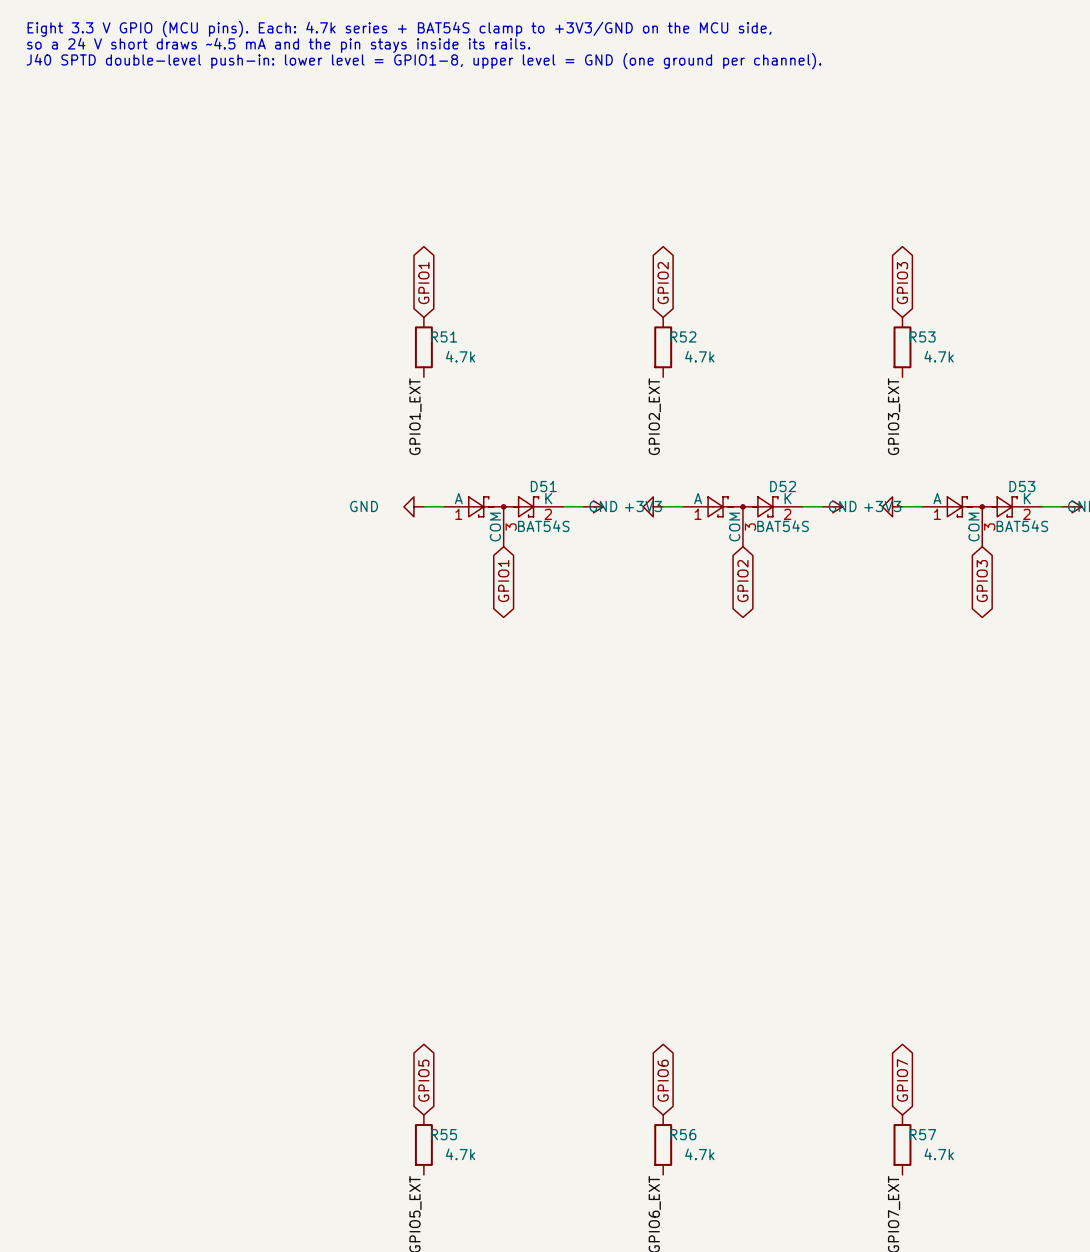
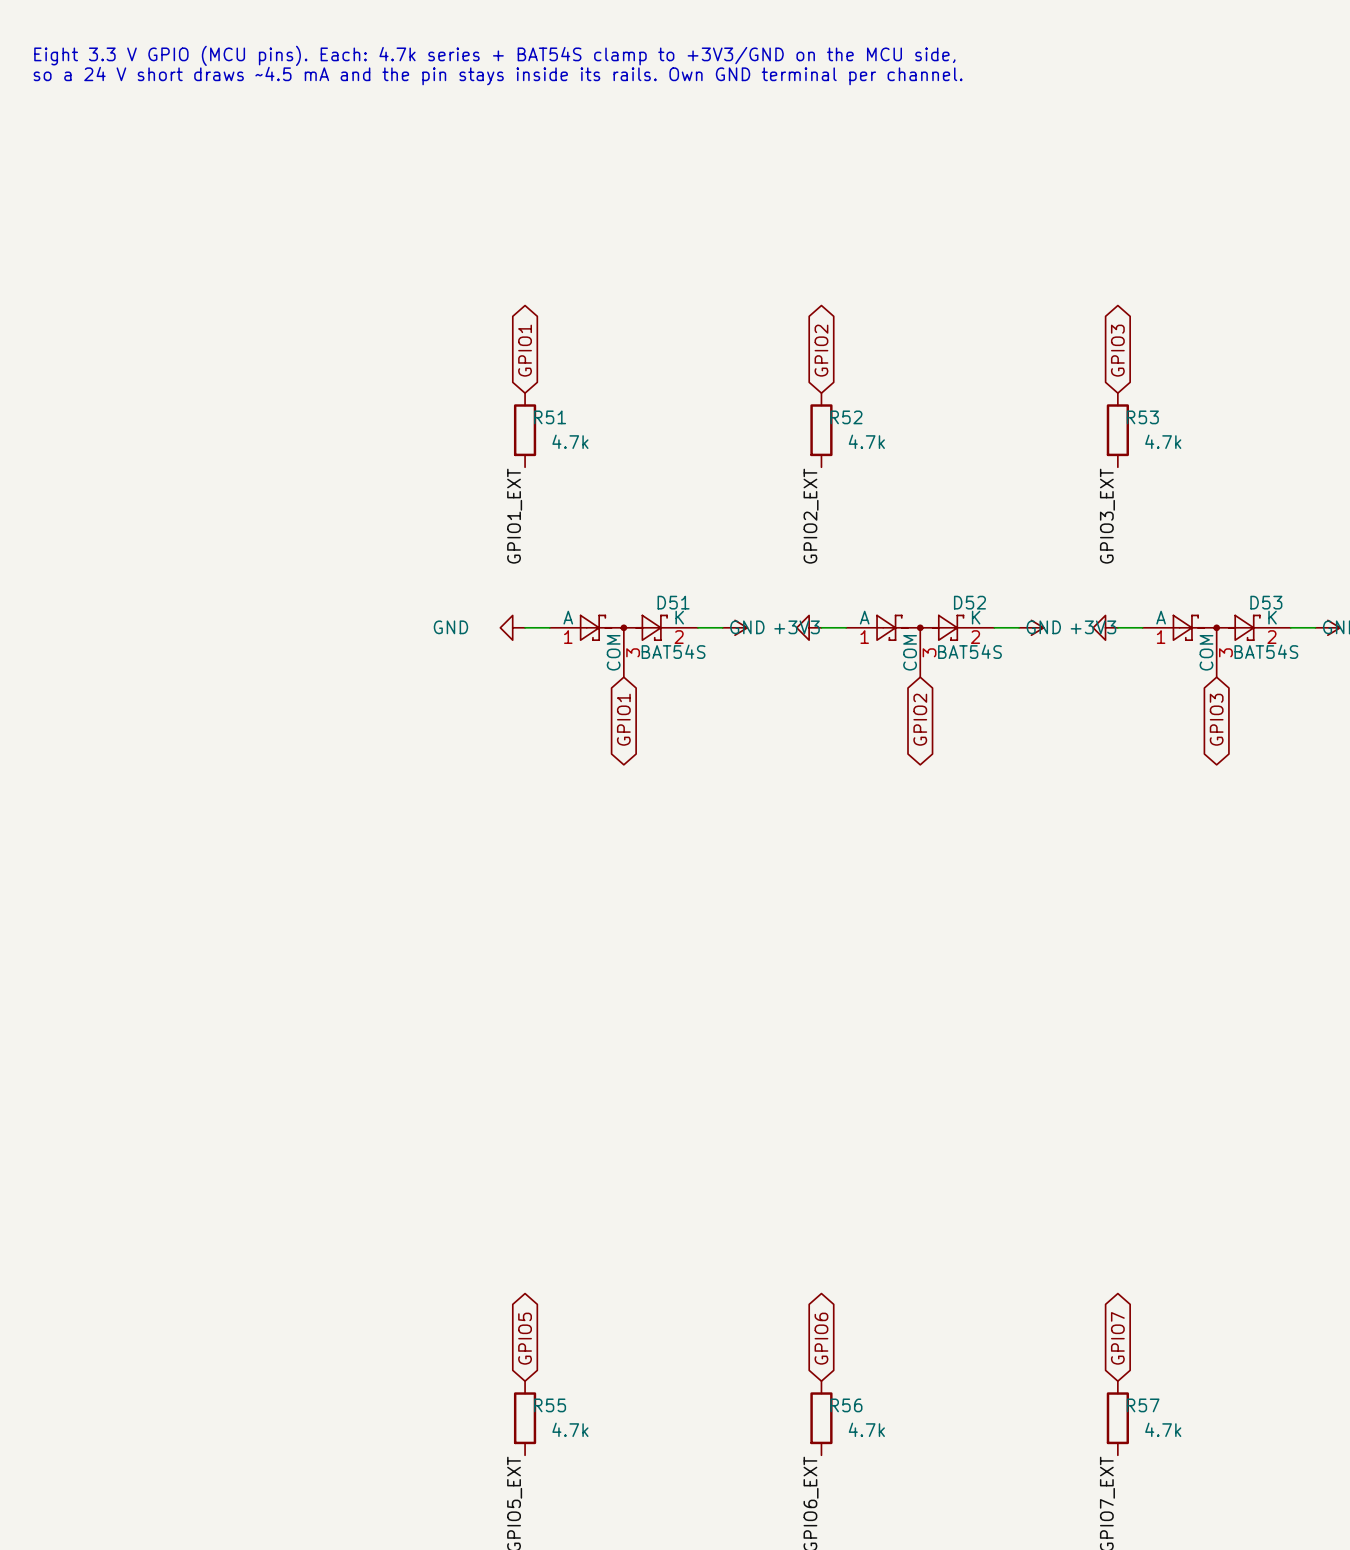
text: Eight 3.3 V GPIO (MCU pins). Each: 4.7k series + BAT54S clamp to +3V3/GND on the MCU side, (399, 29) -> none
text: so a 24 V short draws ~4.5 mA and the pin stays inside its rails. (278, 45) -> Eight 3.3 V GPIO (MCU pins). Each: 4.7k series + BAT54S clamp to +3V3/GND on the MCU side, (494, 55)
text: J40 SPTD double-level push-in: lower level = GPIO1-8, upper level = GND (one ground per channel). (423, 61) -> so a 24 V short draws ~4.5 mA and the pin stays inside its rails. Own GND terminal per channel. (498, 76)

